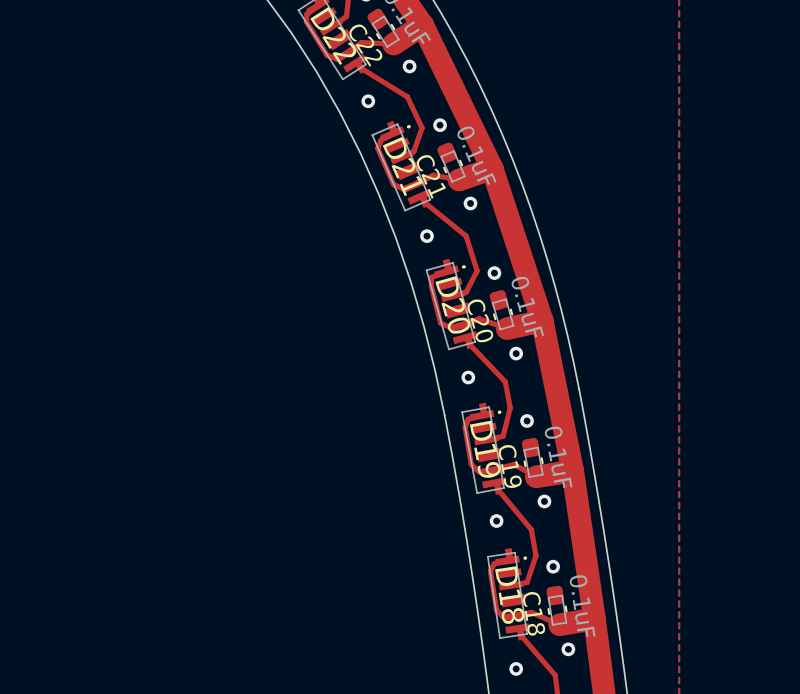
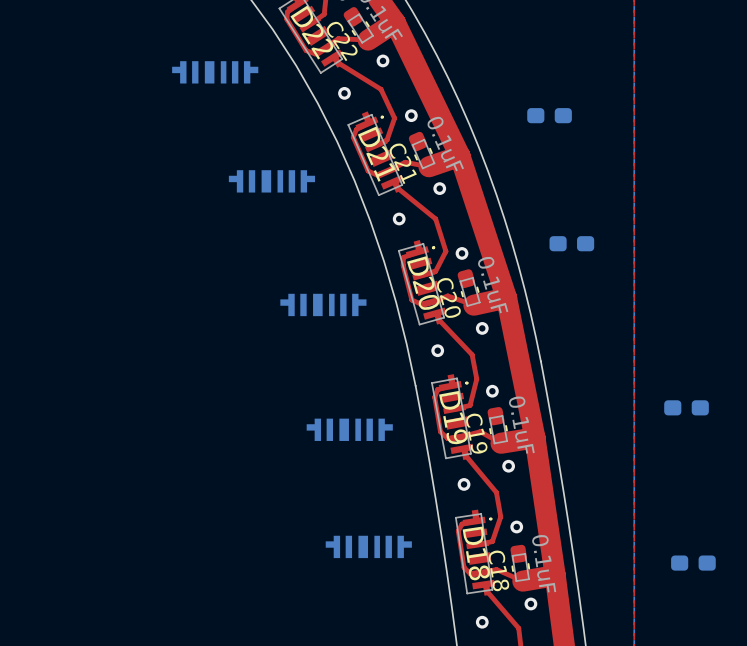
part: none -> (215, 72)
part: none -> (549, 115)
part: none -> (271, 181)
part: none -> (571, 243)
part: none -> (323, 304)
part: none -> (686, 407)
part: none -> (349, 429)
part: none -> (368, 546)
part: none -> (693, 563)

